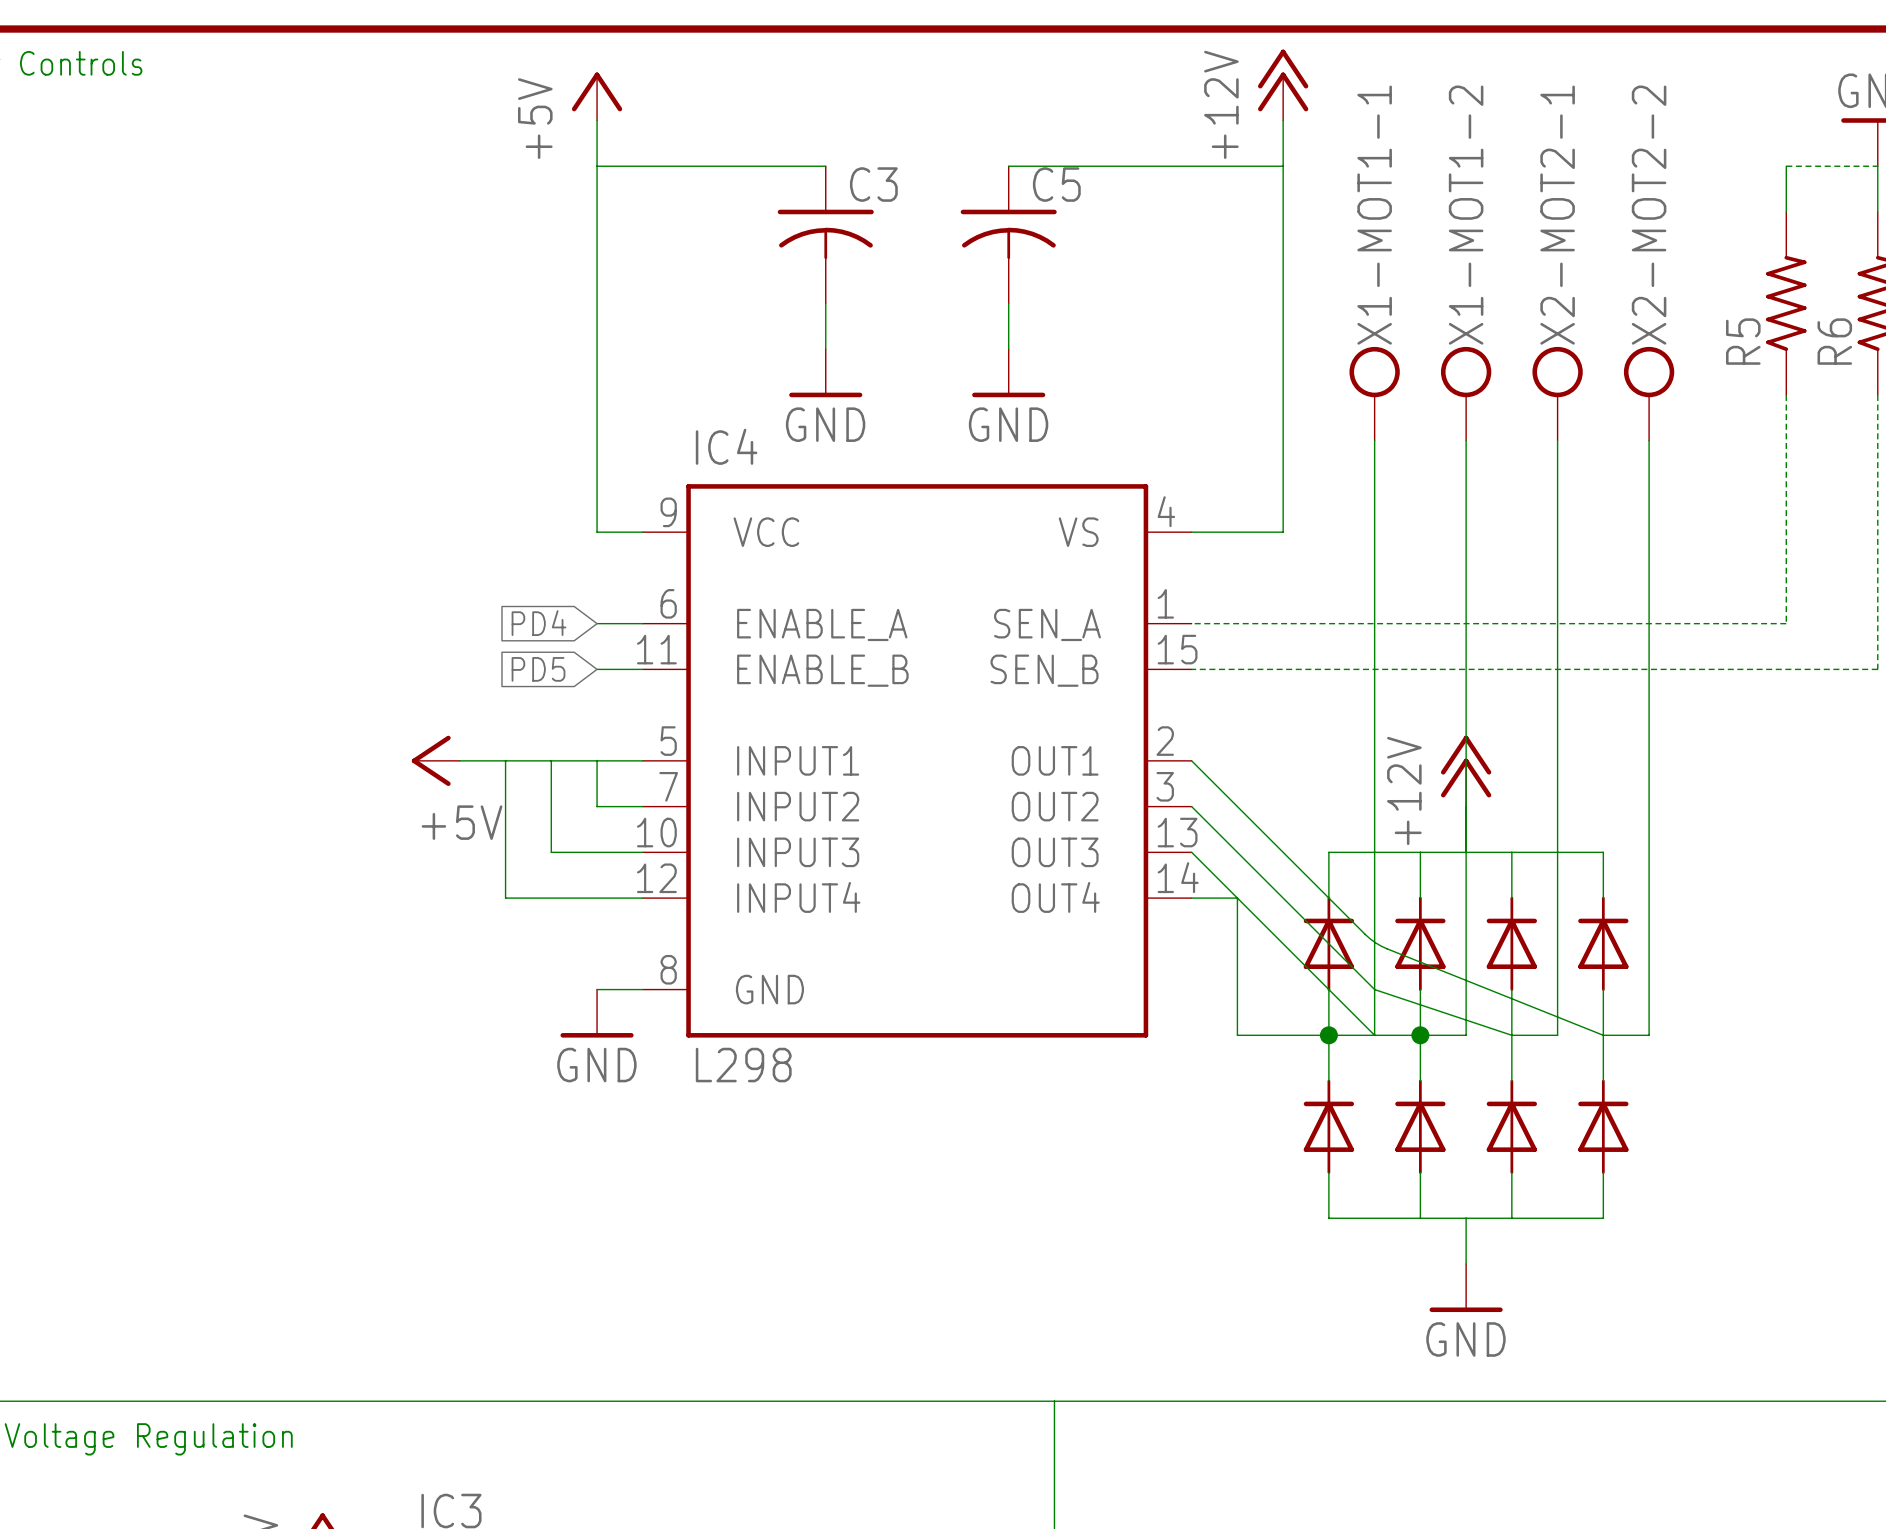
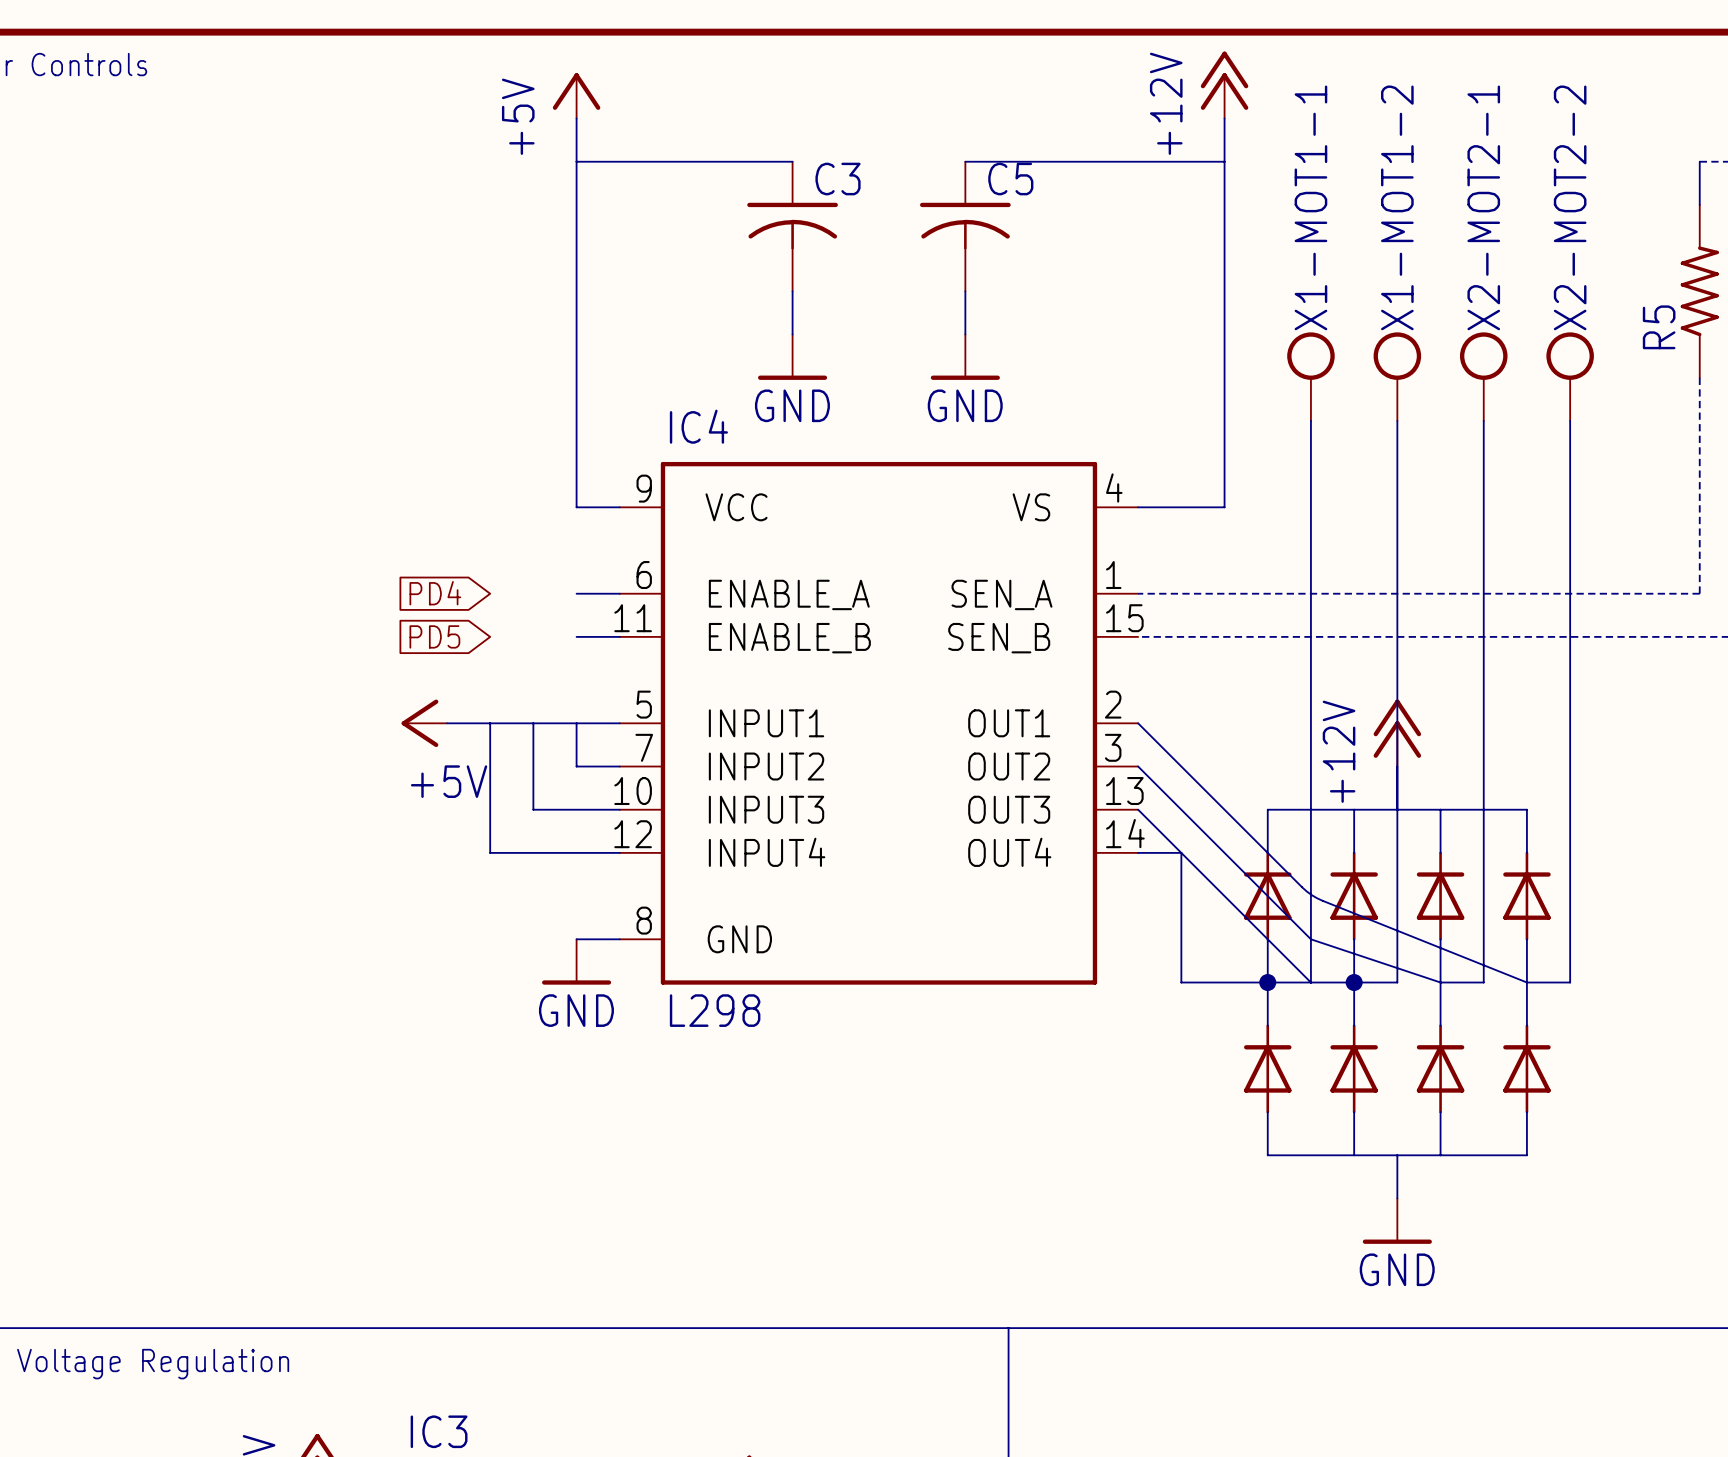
global label position: PD4 (538, 623) -> PD4 (435, 593)
global label position: PD5 (538, 669) -> PD5 (434, 636)

